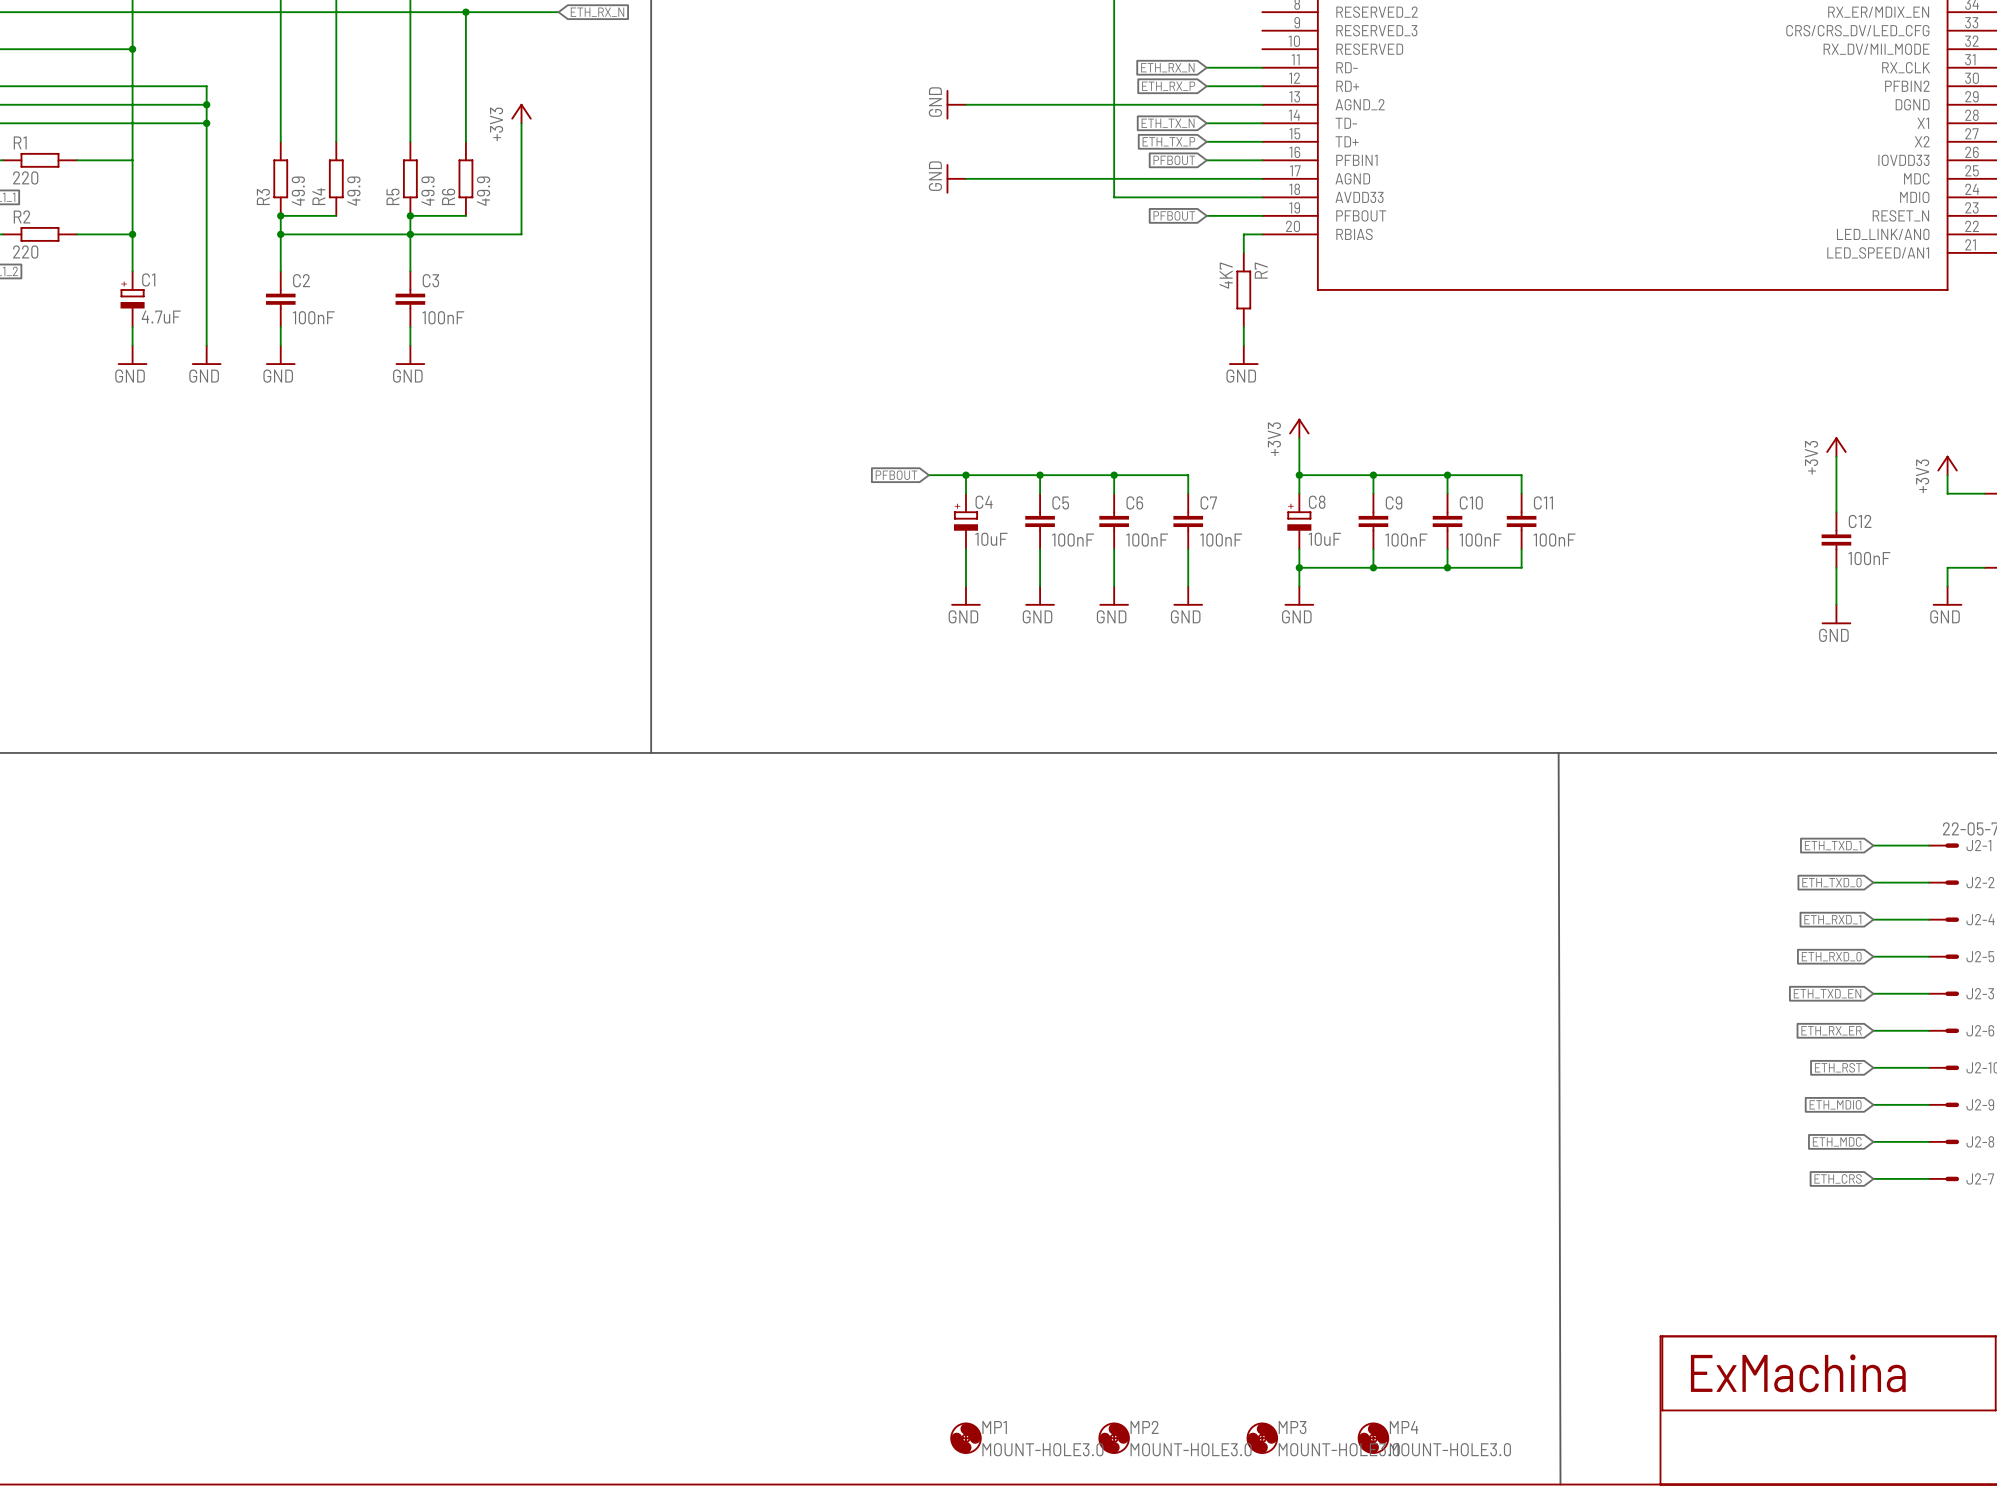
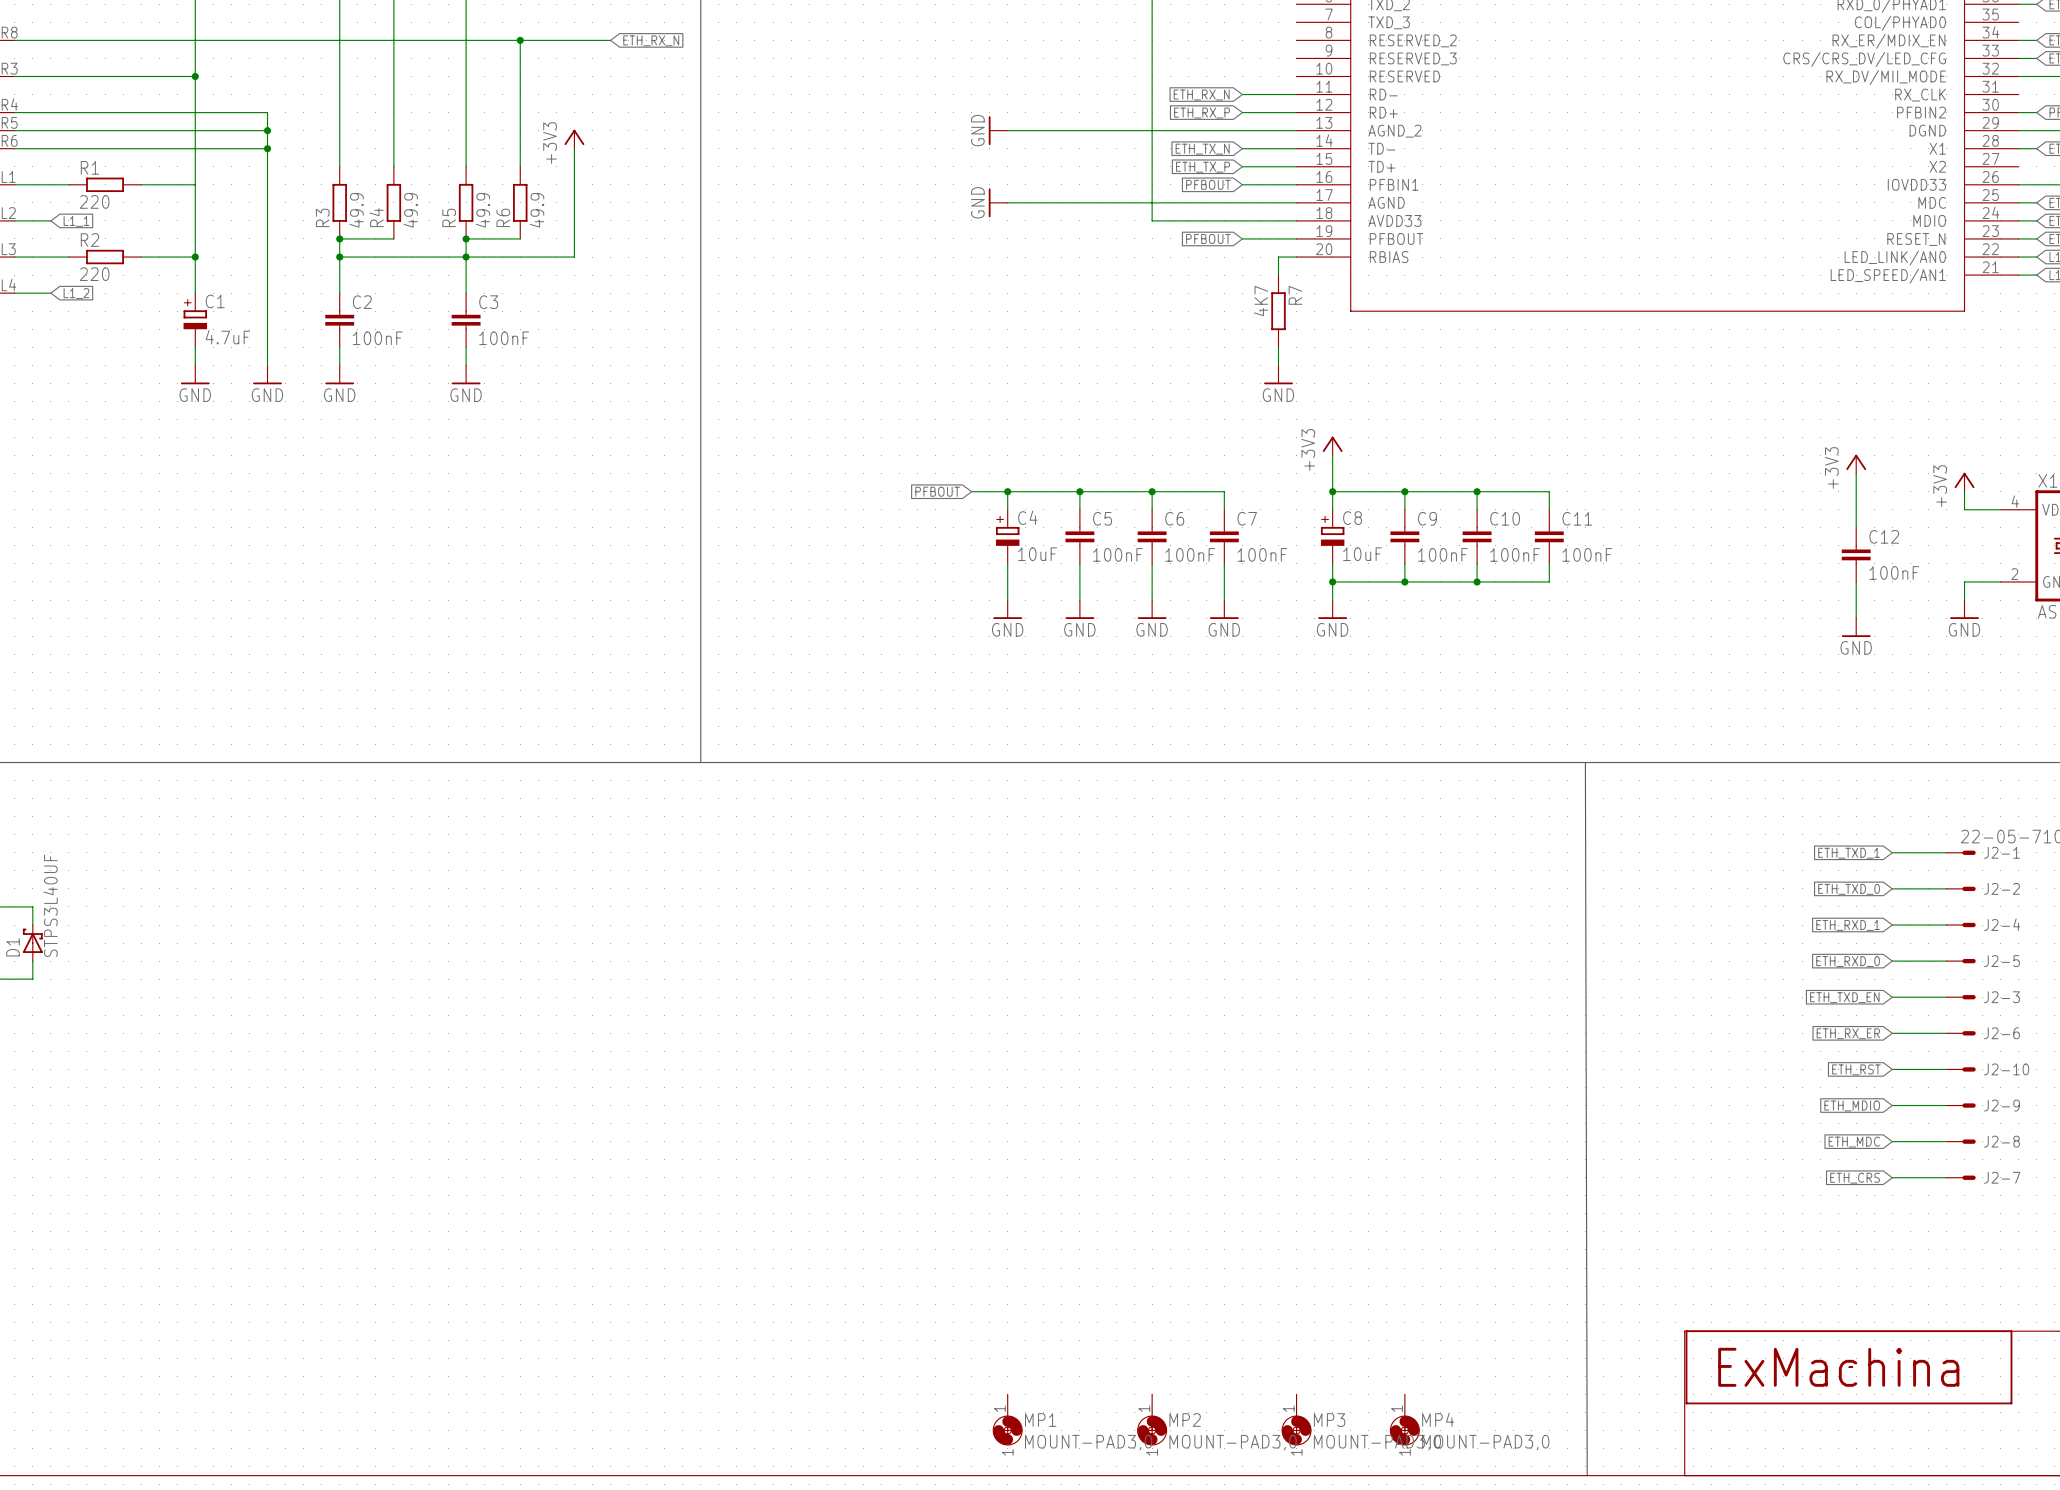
MP1 symbol: [950, 1423, 981, 1454] -> [993, 1394, 1023, 1446]
MP2 symbol: [1099, 1423, 1130, 1454] -> [1137, 1394, 1167, 1446]
MP3 symbol: [1247, 1423, 1278, 1454] -> [1281, 1394, 1312, 1446]
MP4 symbol: [1358, 1423, 1389, 1454] -> [1390, 1394, 1420, 1446]
MP1 value: MOUNT-HOLE3.0 (1042, 1449) -> MOUNT-PAD3,0 (1088, 1442)
MP2 value: MOUNT-HOLE3.0 (1191, 1449) -> MOUNT-PAD3,0 (1233, 1442)
MP3 value: MOUNT-HOLE3.0 (1339, 1449) -> MOUNT-PAD3,0 (1377, 1442)
MP4 value: MOUNT-HOLE3.0 (1450, 1449) -> MOUNT-PAD3,0 (1485, 1442)

